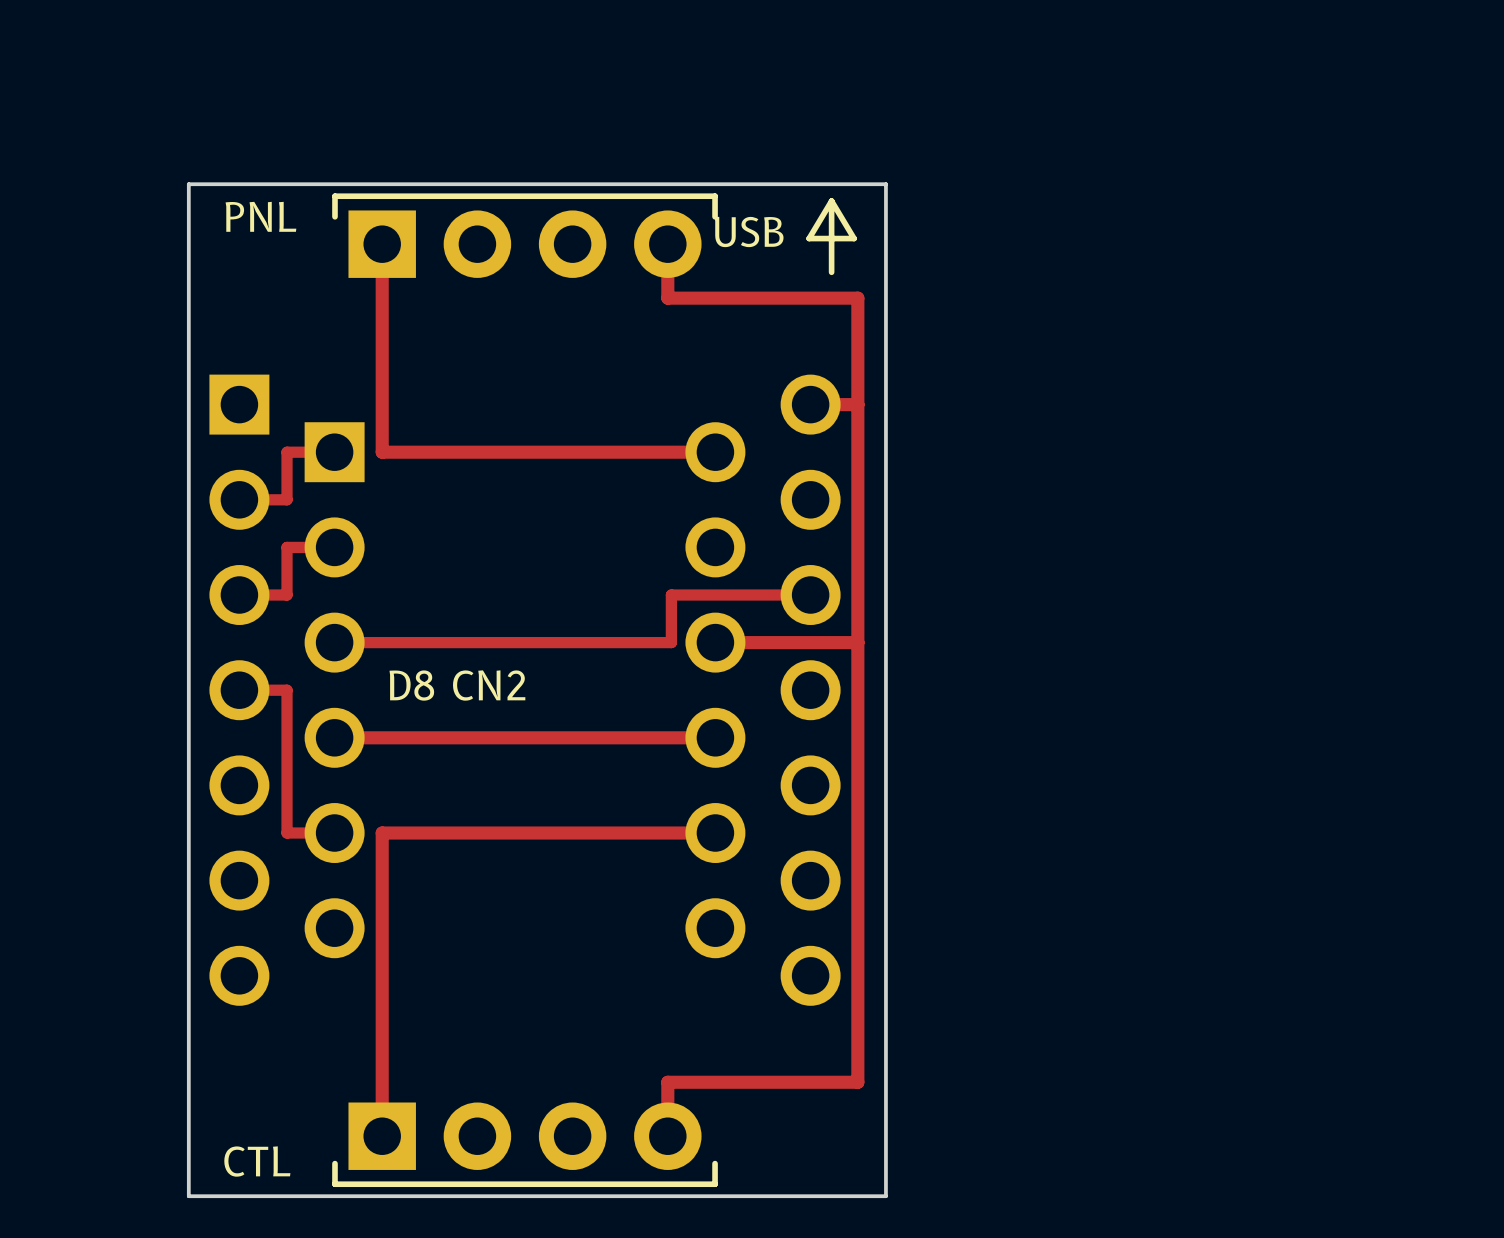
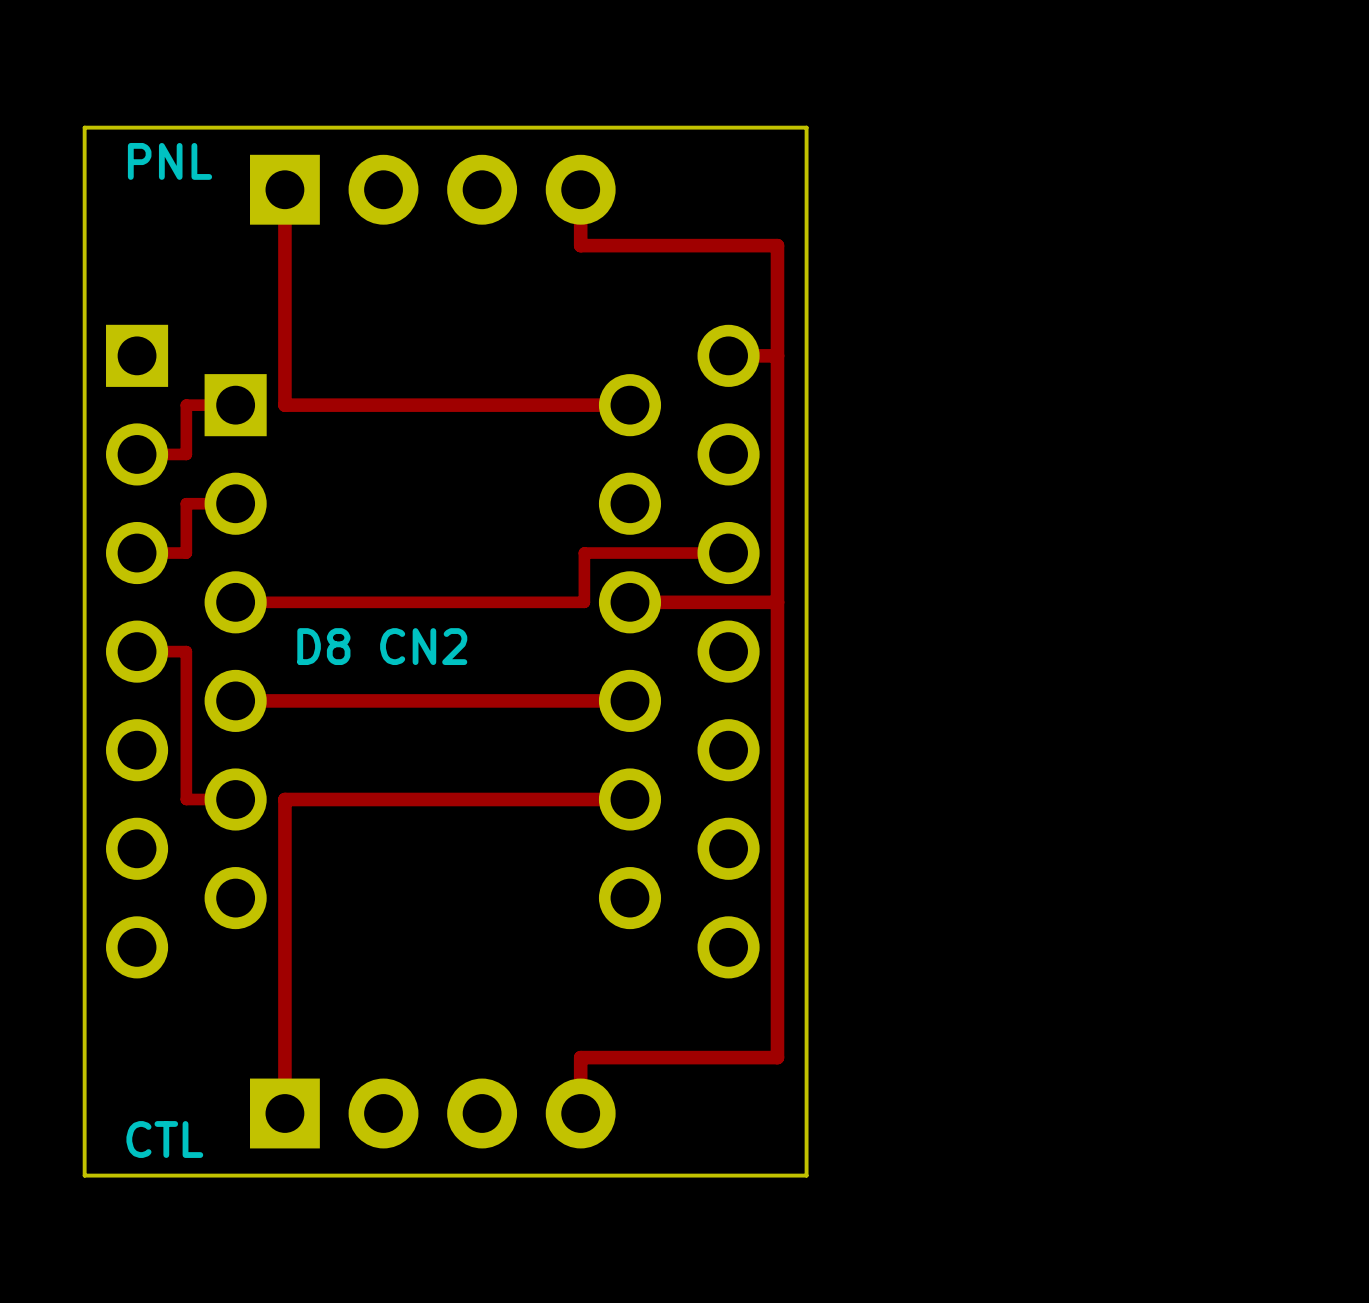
line: (831, 201) (809, 238) (854, 238) (831, 201) -> none
line: (831, 201) (831, 272) -> none
line: (334, 216) (334, 196) (715, 196) (715, 216) -> none
text: USB (749, 231) -> none
line: (334, 1163) (334, 1184) (715, 1184) (715, 1163) -> none

